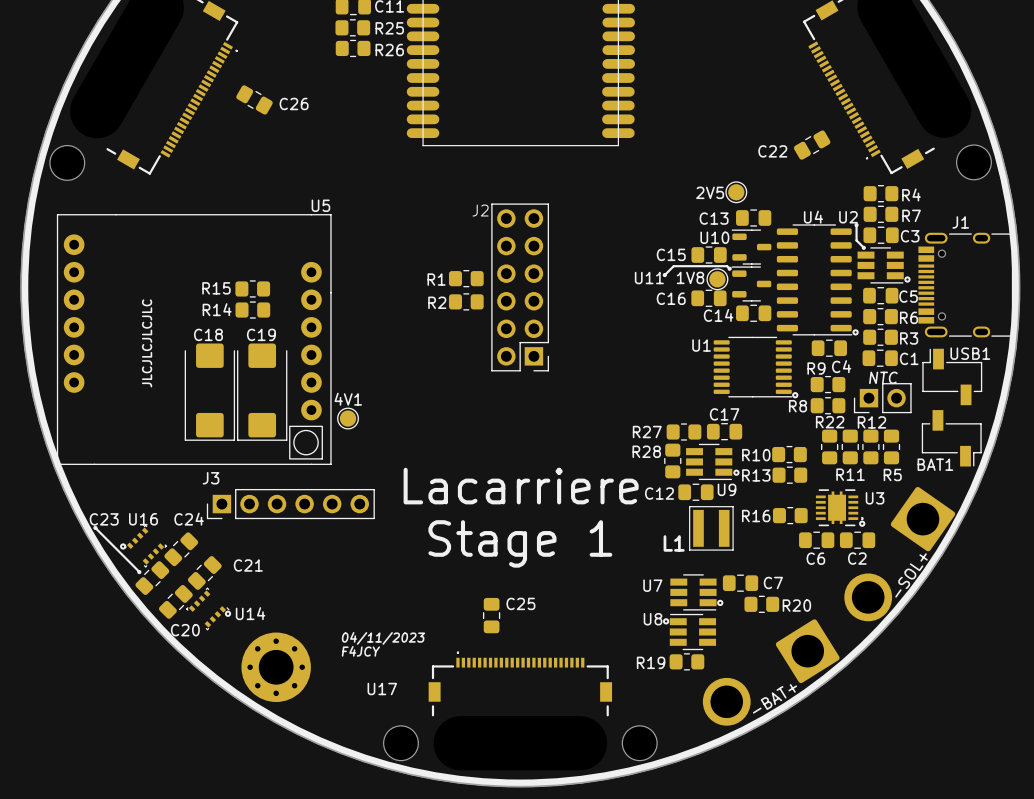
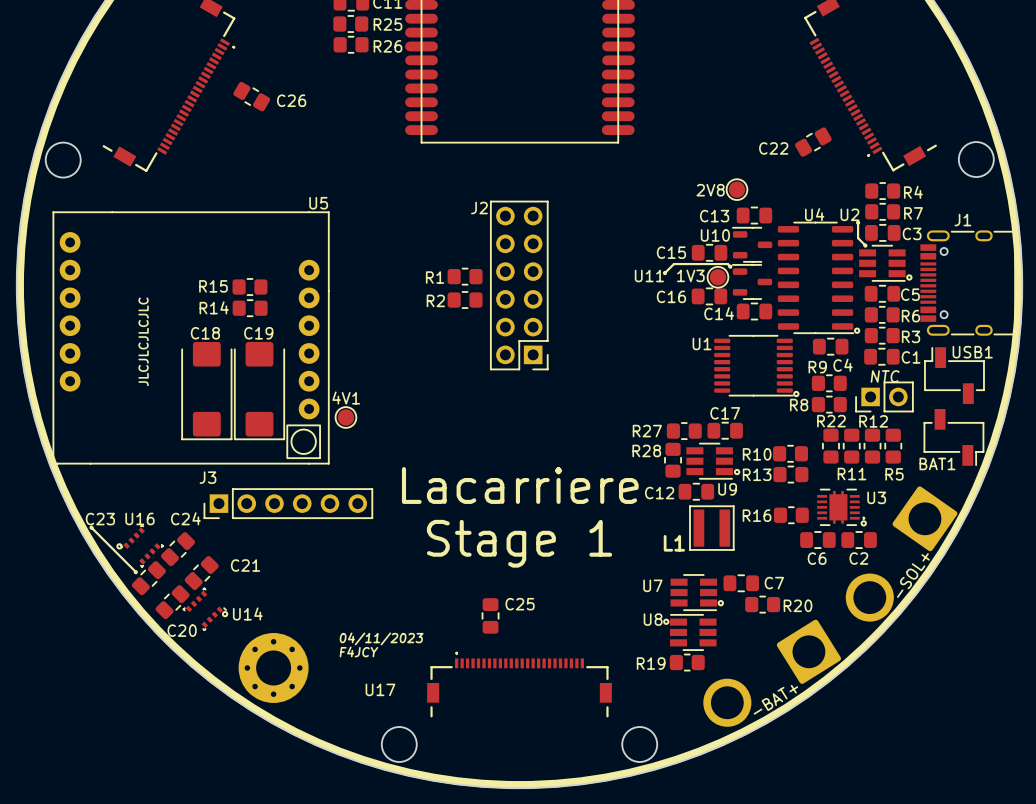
2V5 name: 2V5 (710, 192) -> 2V8 (710, 190)
1V8 name: 1V8 (690, 277) -> 1V3 (690, 275)

